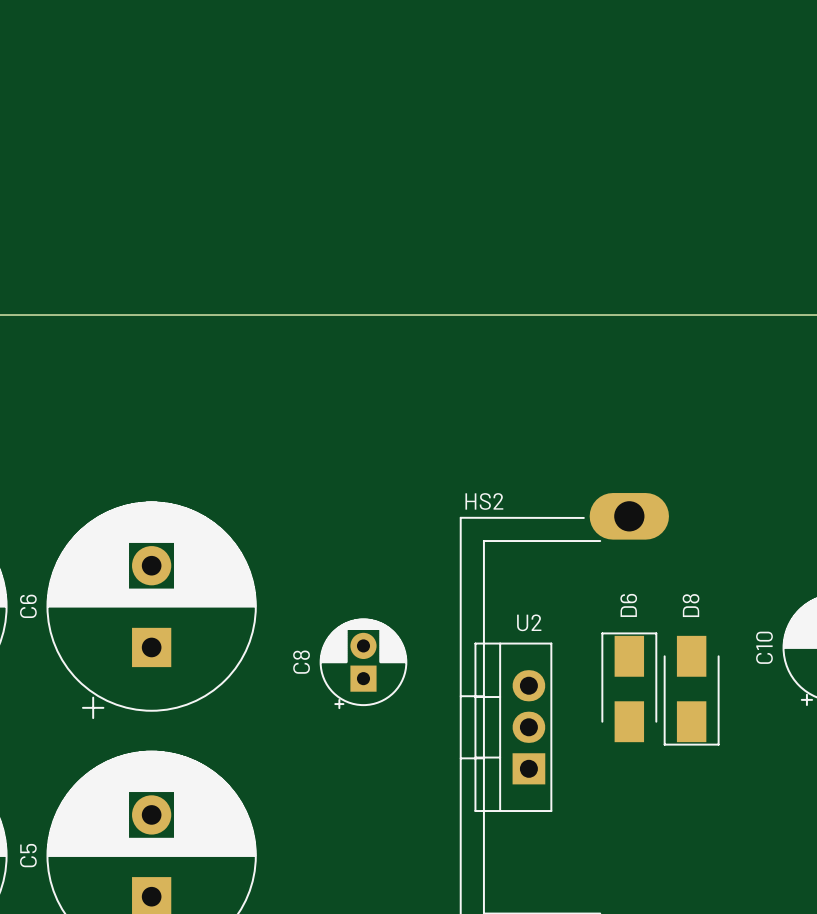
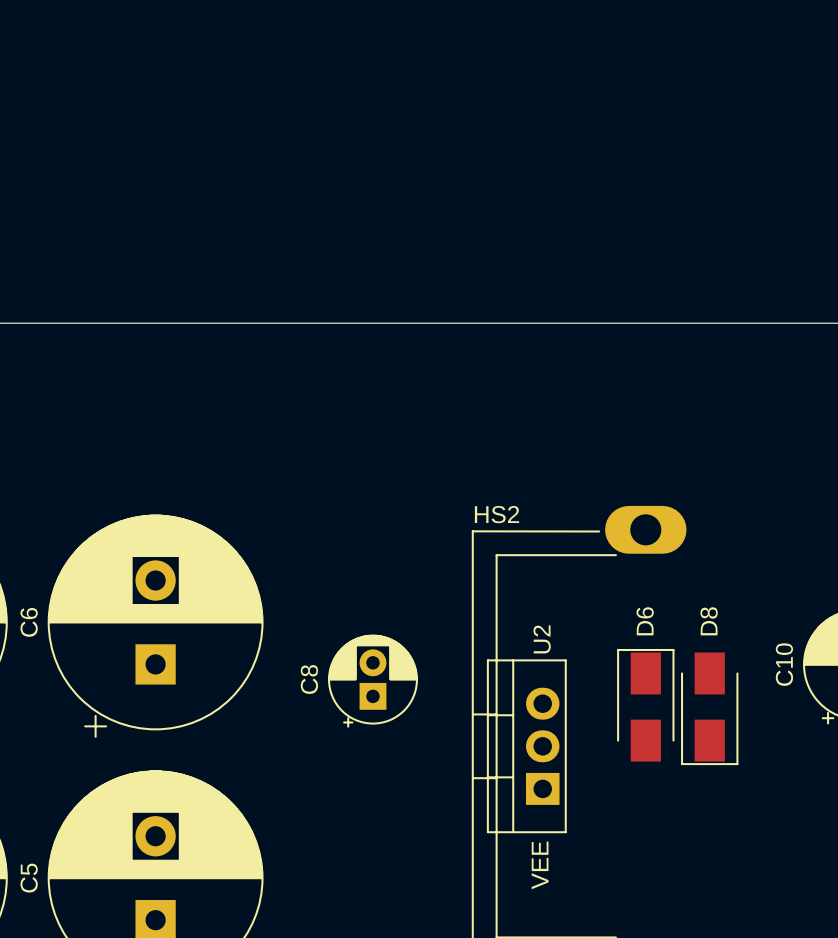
U2 name rotation: 0° (529, 622) -> 90° counterclockwise (542, 639)
text: none -> VEE (540, 865)

